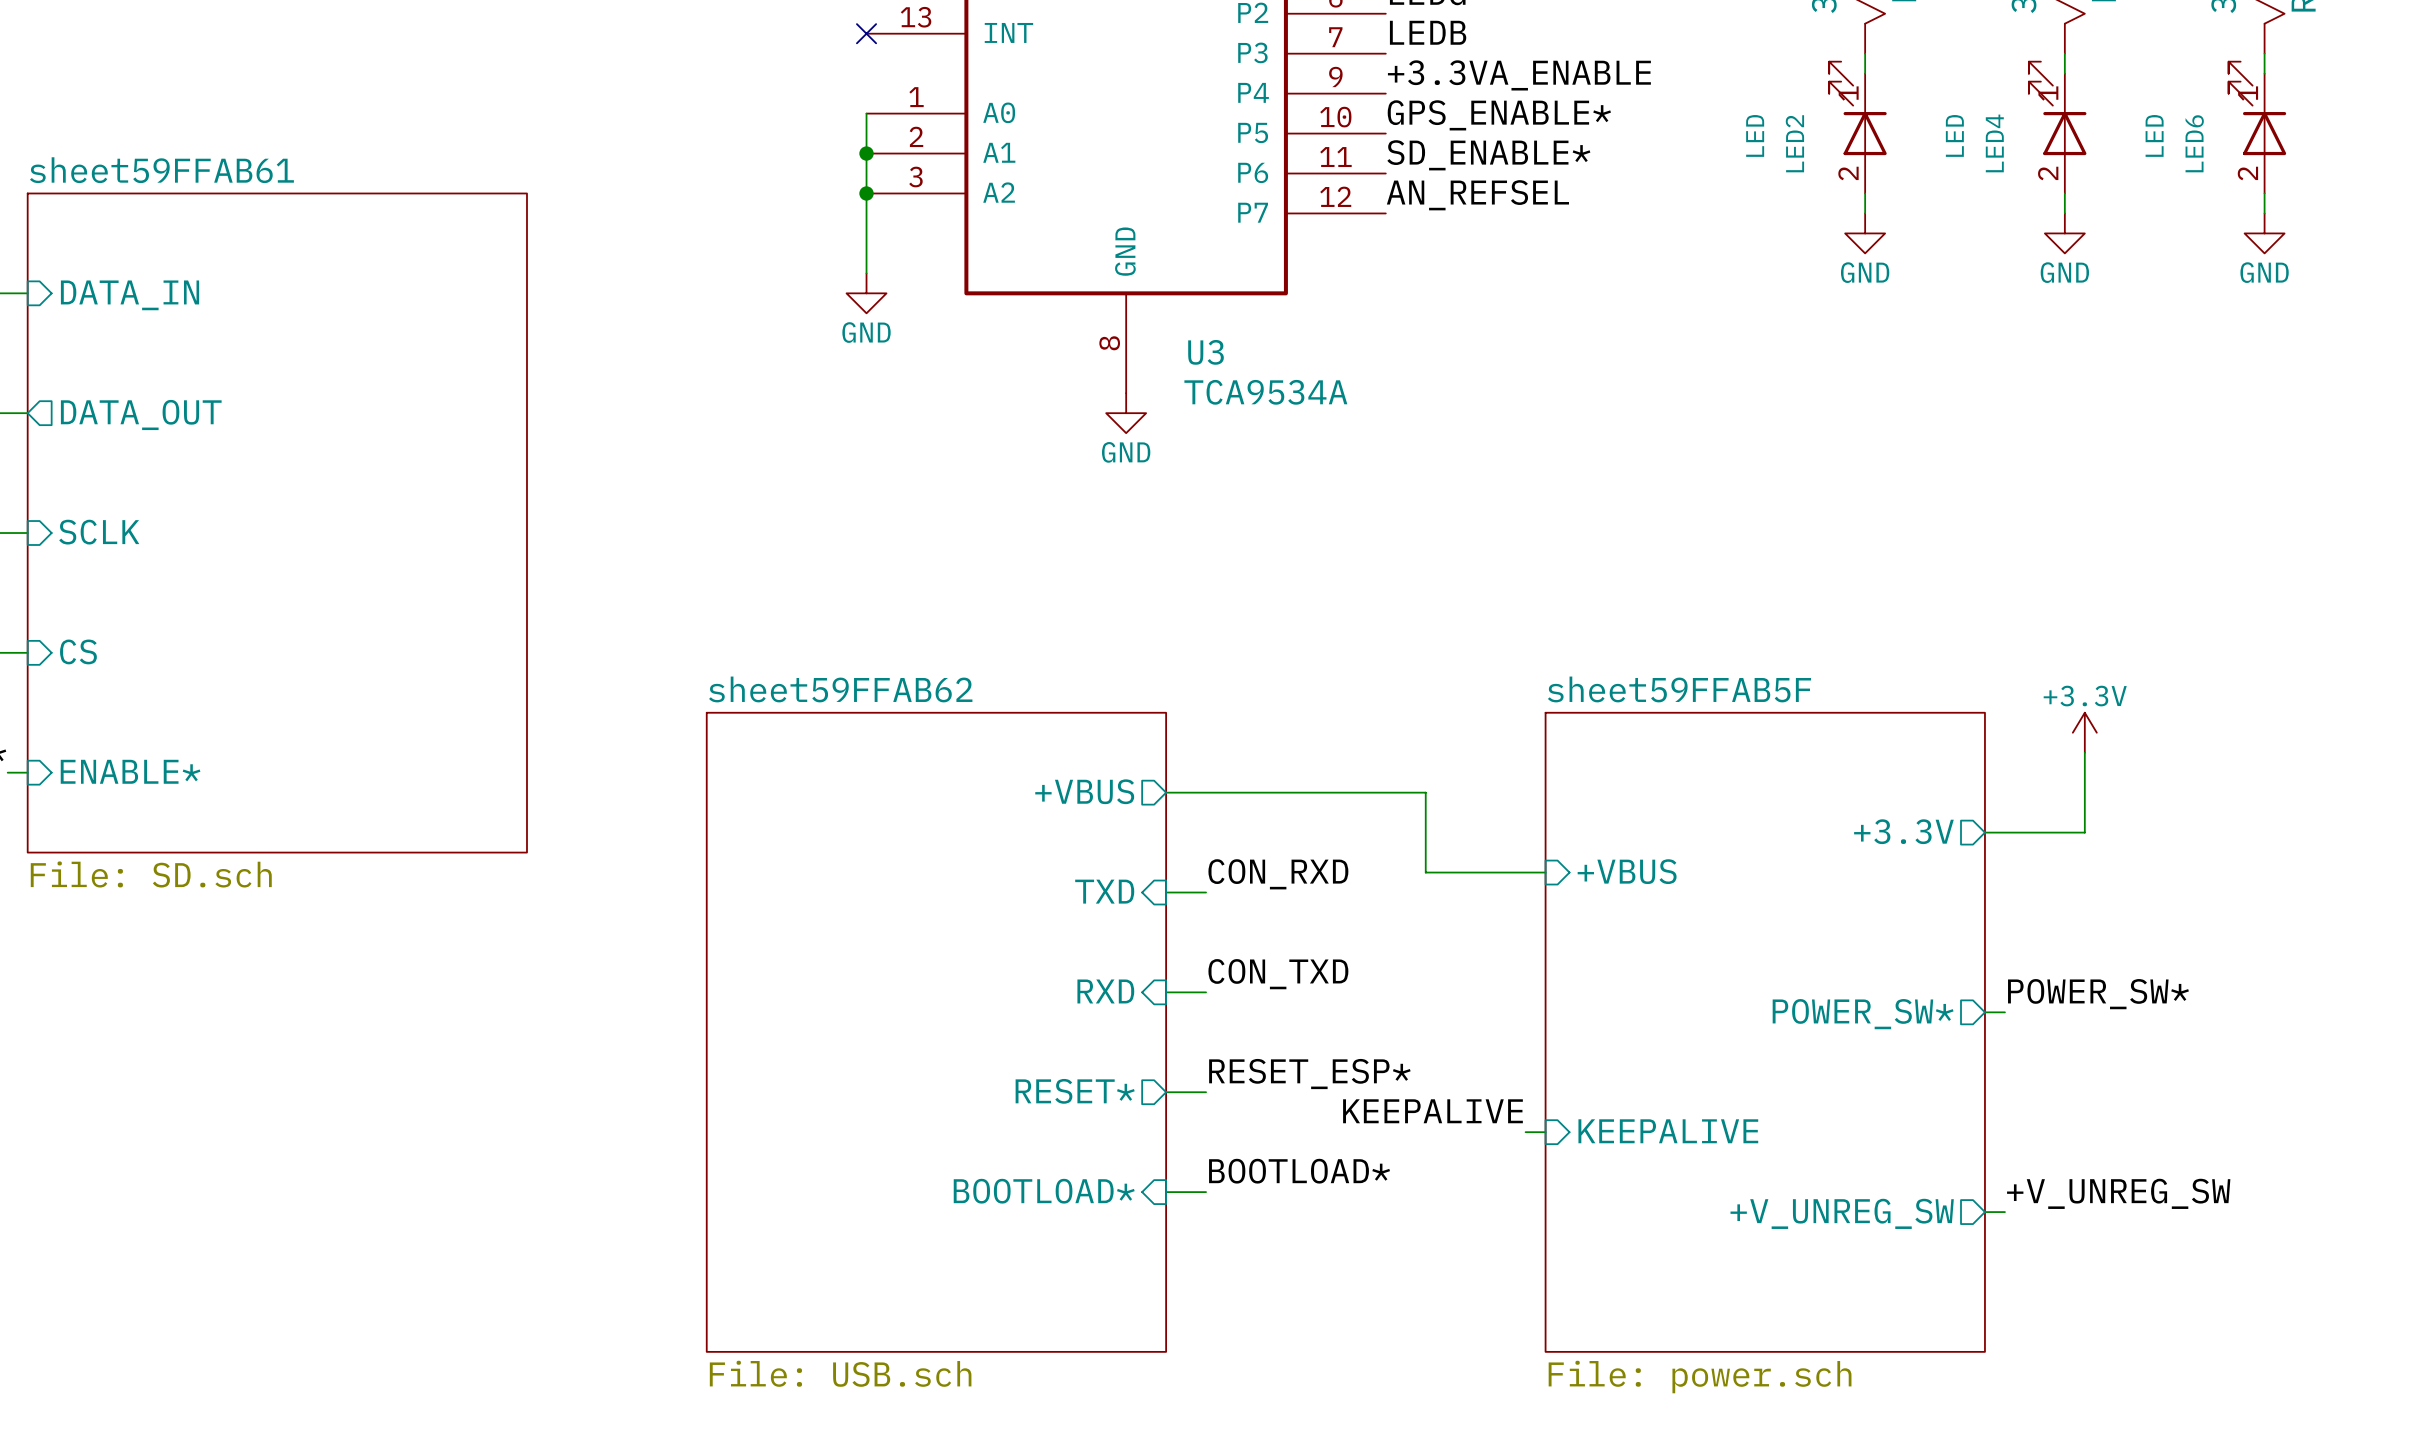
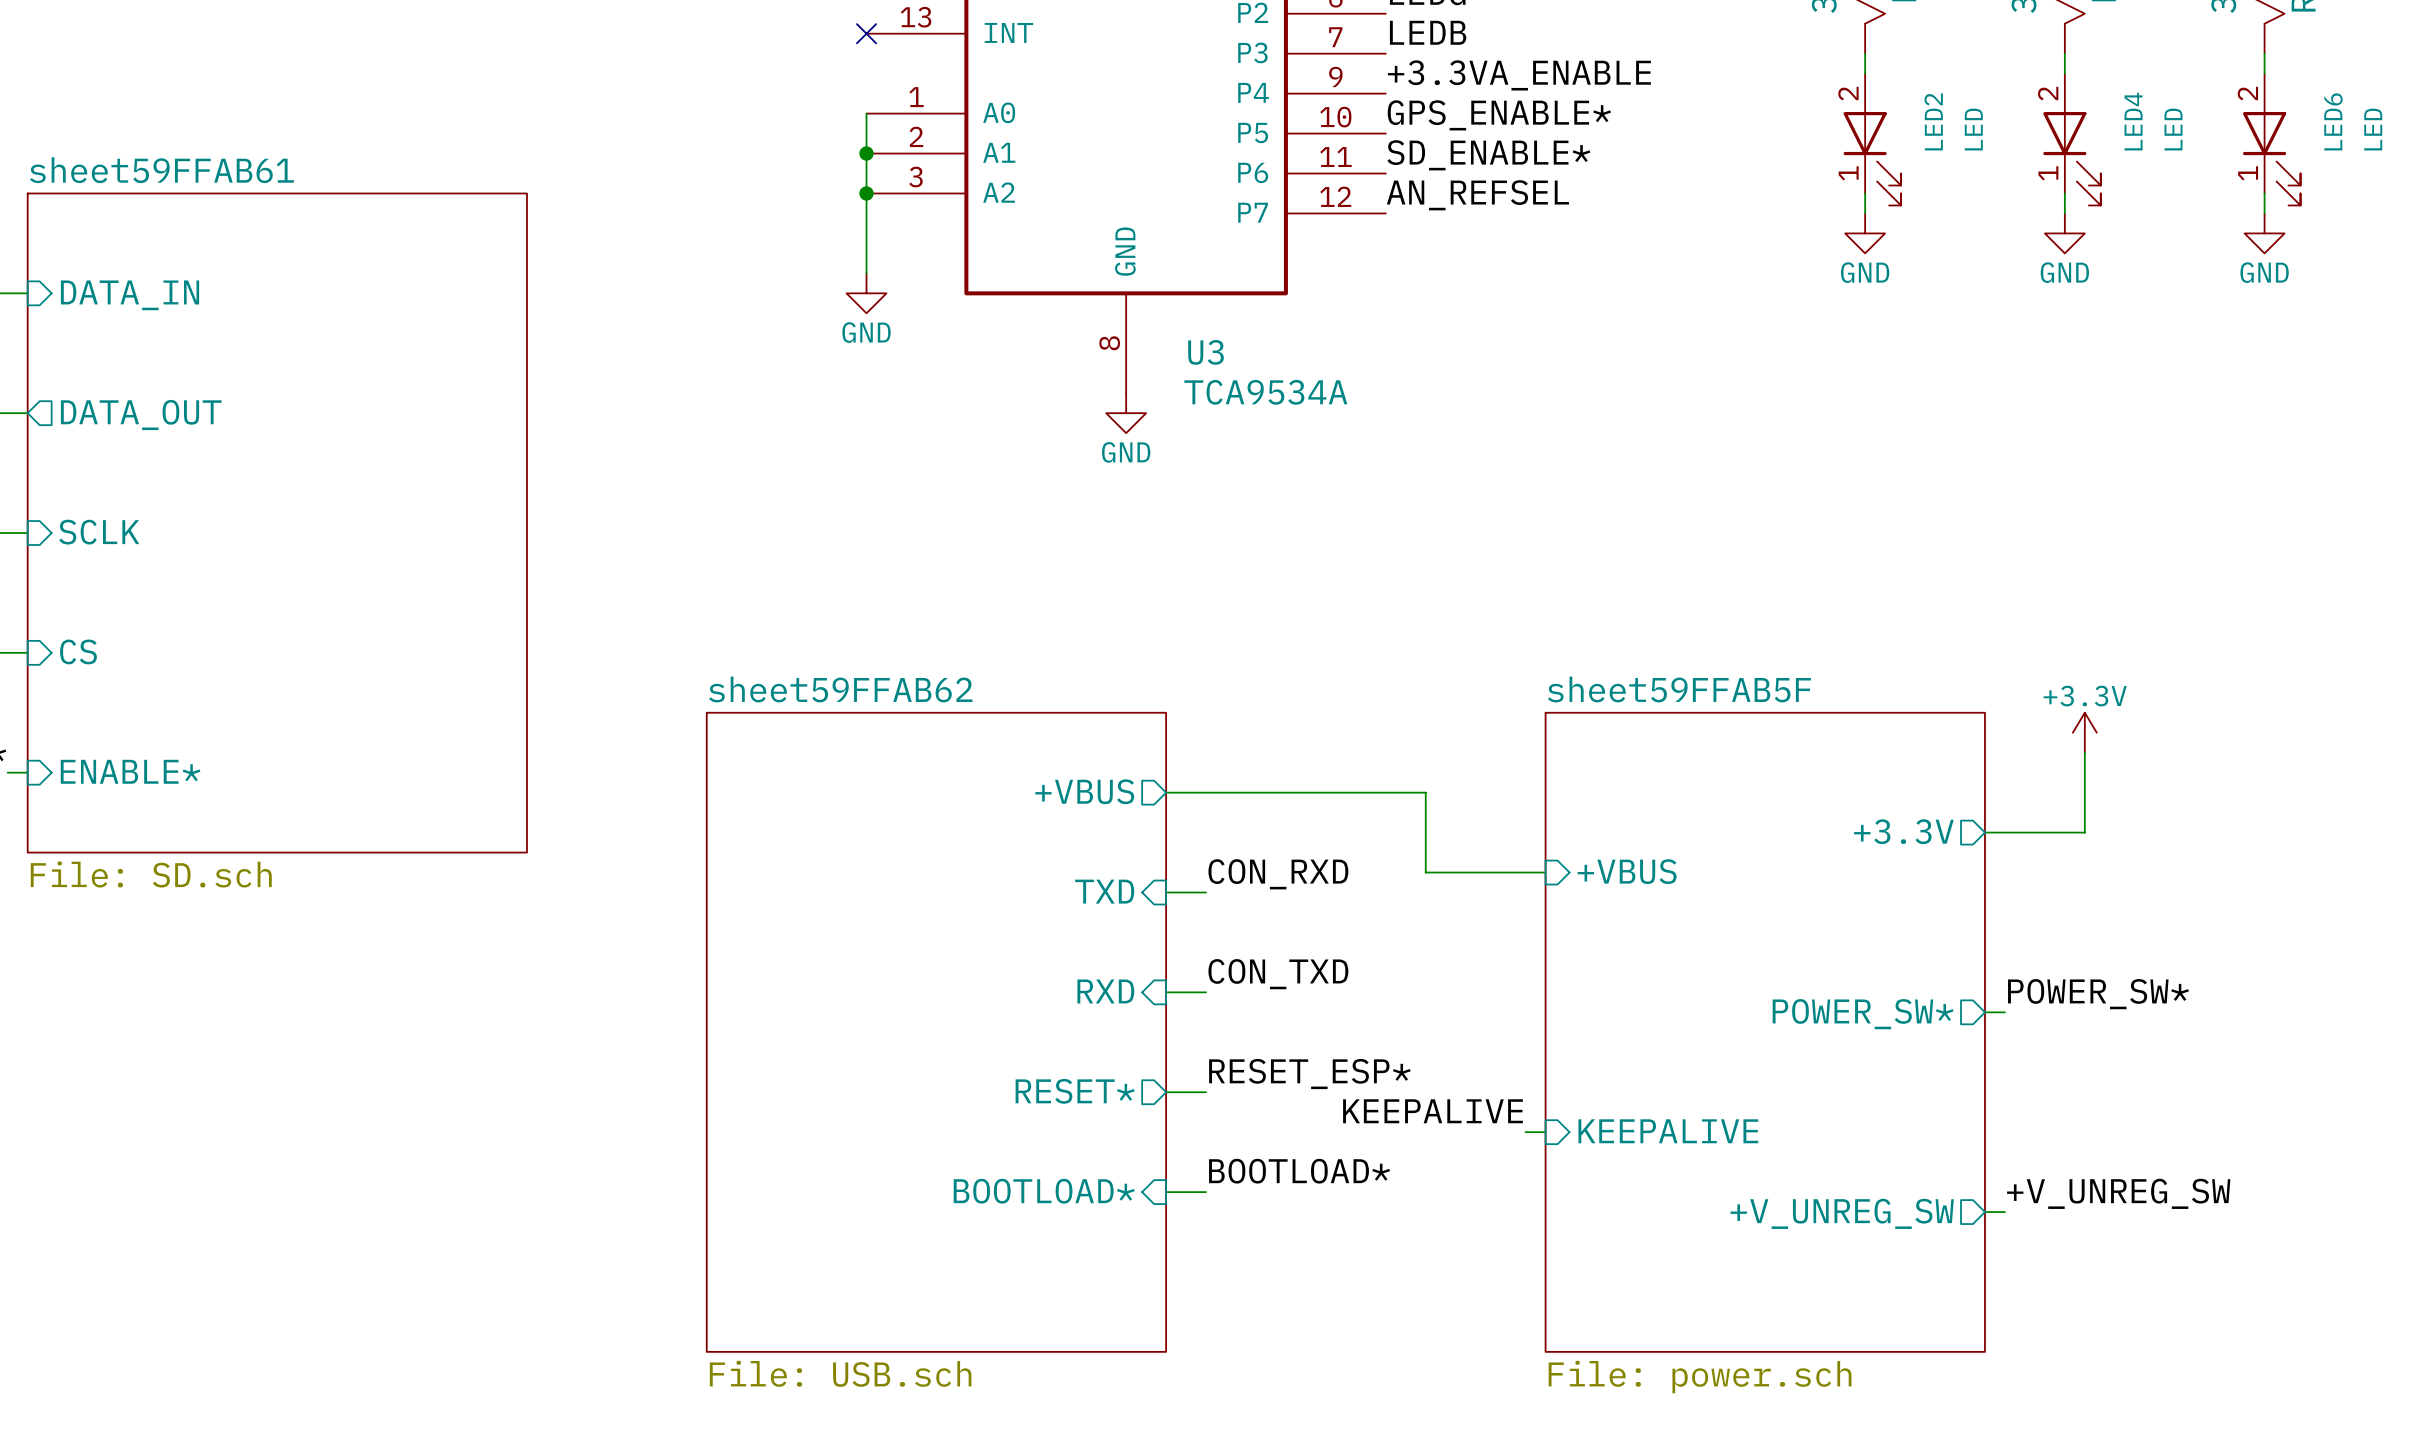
LED2 rotation: 0° (1857, 108) -> 180° (1872, 158)
LED4 rotation: 0° (2057, 108) -> 180° (2072, 158)
LED6 rotation: 0° (2257, 108) -> 180° (2271, 158)

